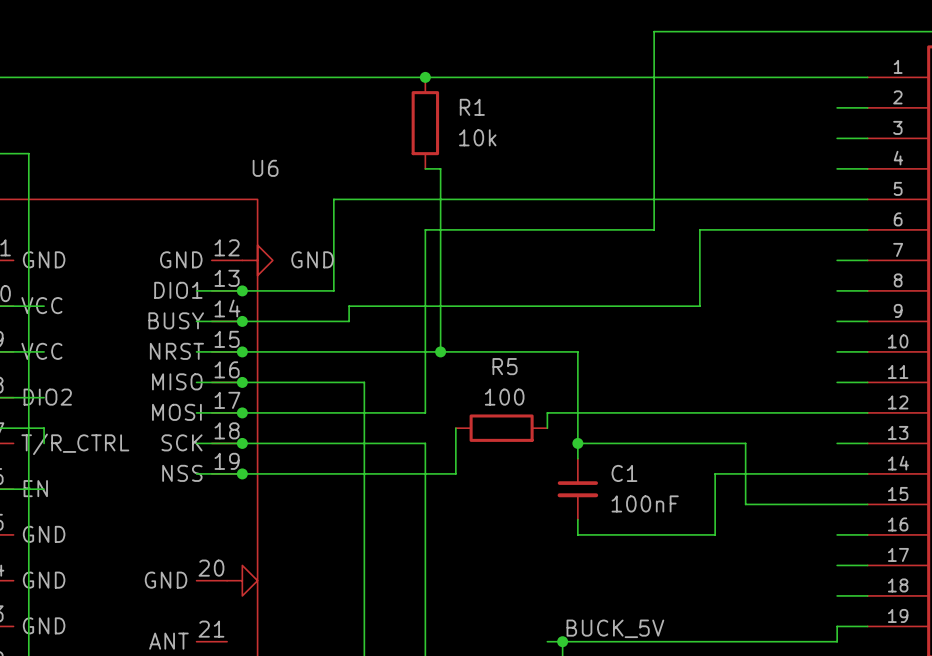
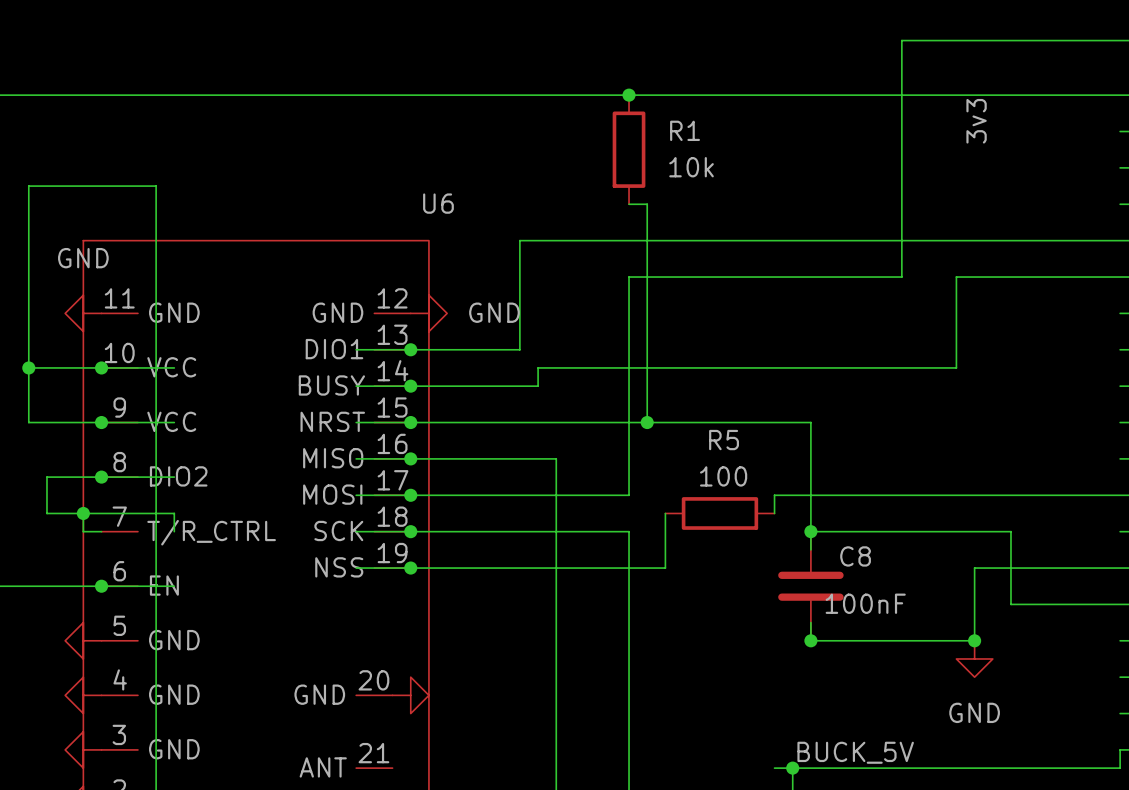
label: none -> 3v3 (976, 121)
C1: 100nF (577, 489) -> none
C8: none -> 100nF (810, 586)
junction: none -> (810, 640)
junction: none -> (974, 640)
power symbol: none -> GND (974, 658)

